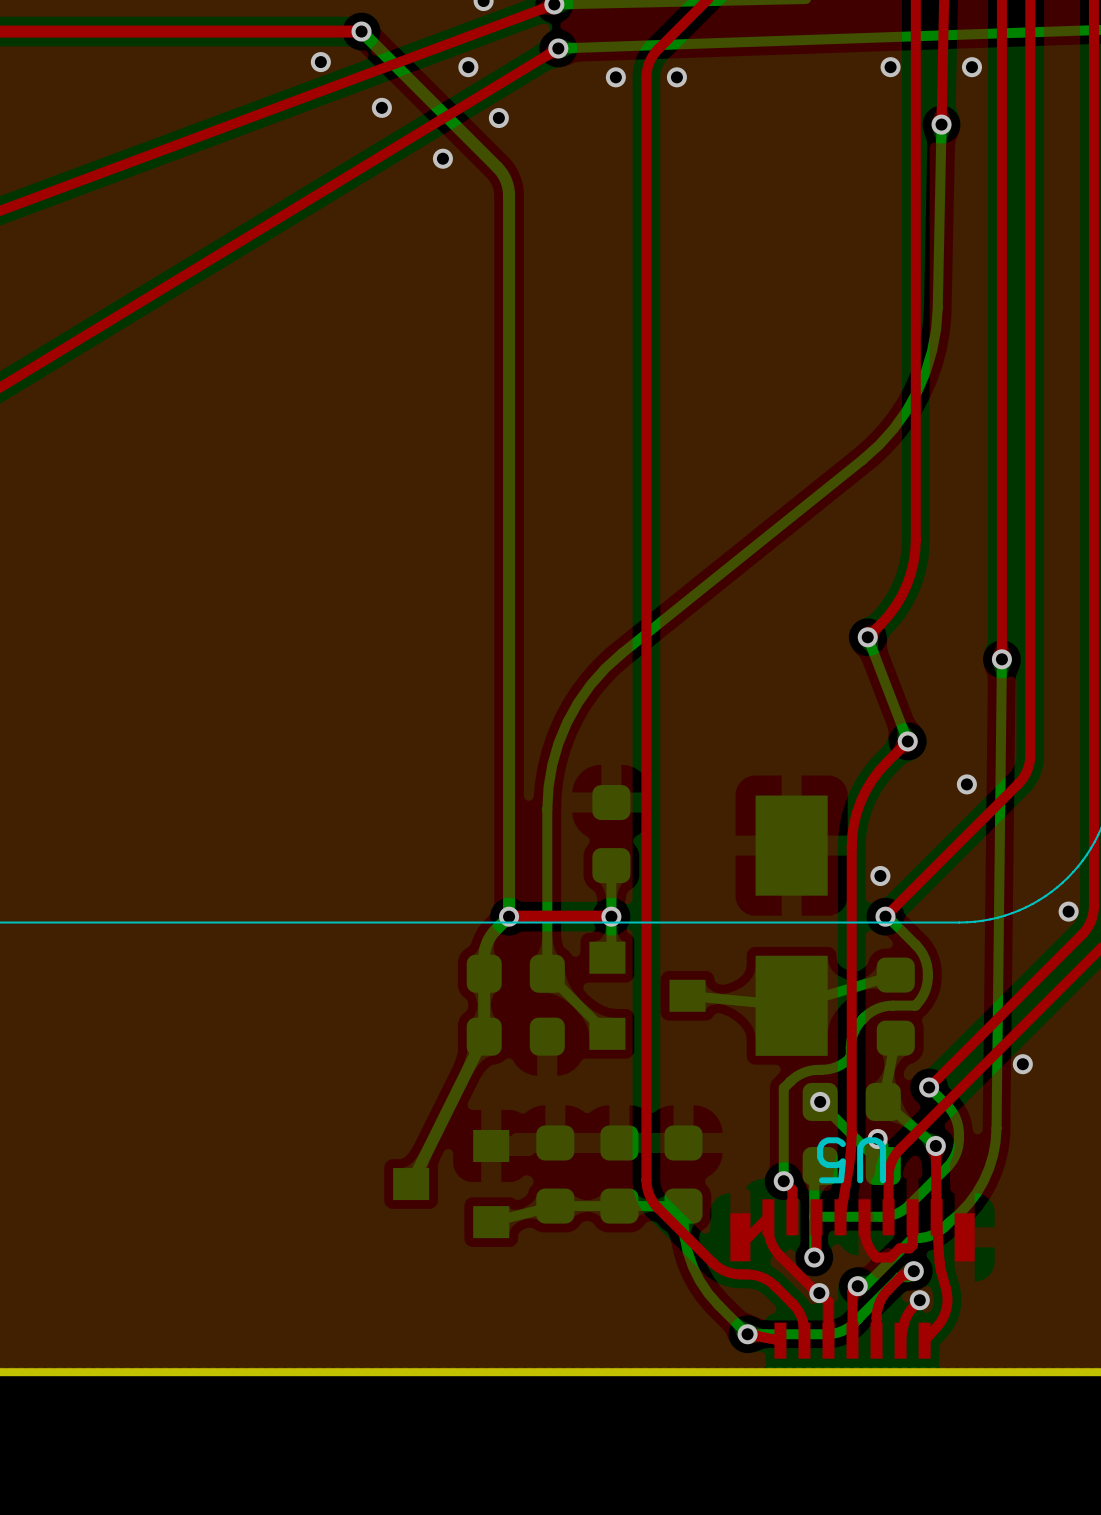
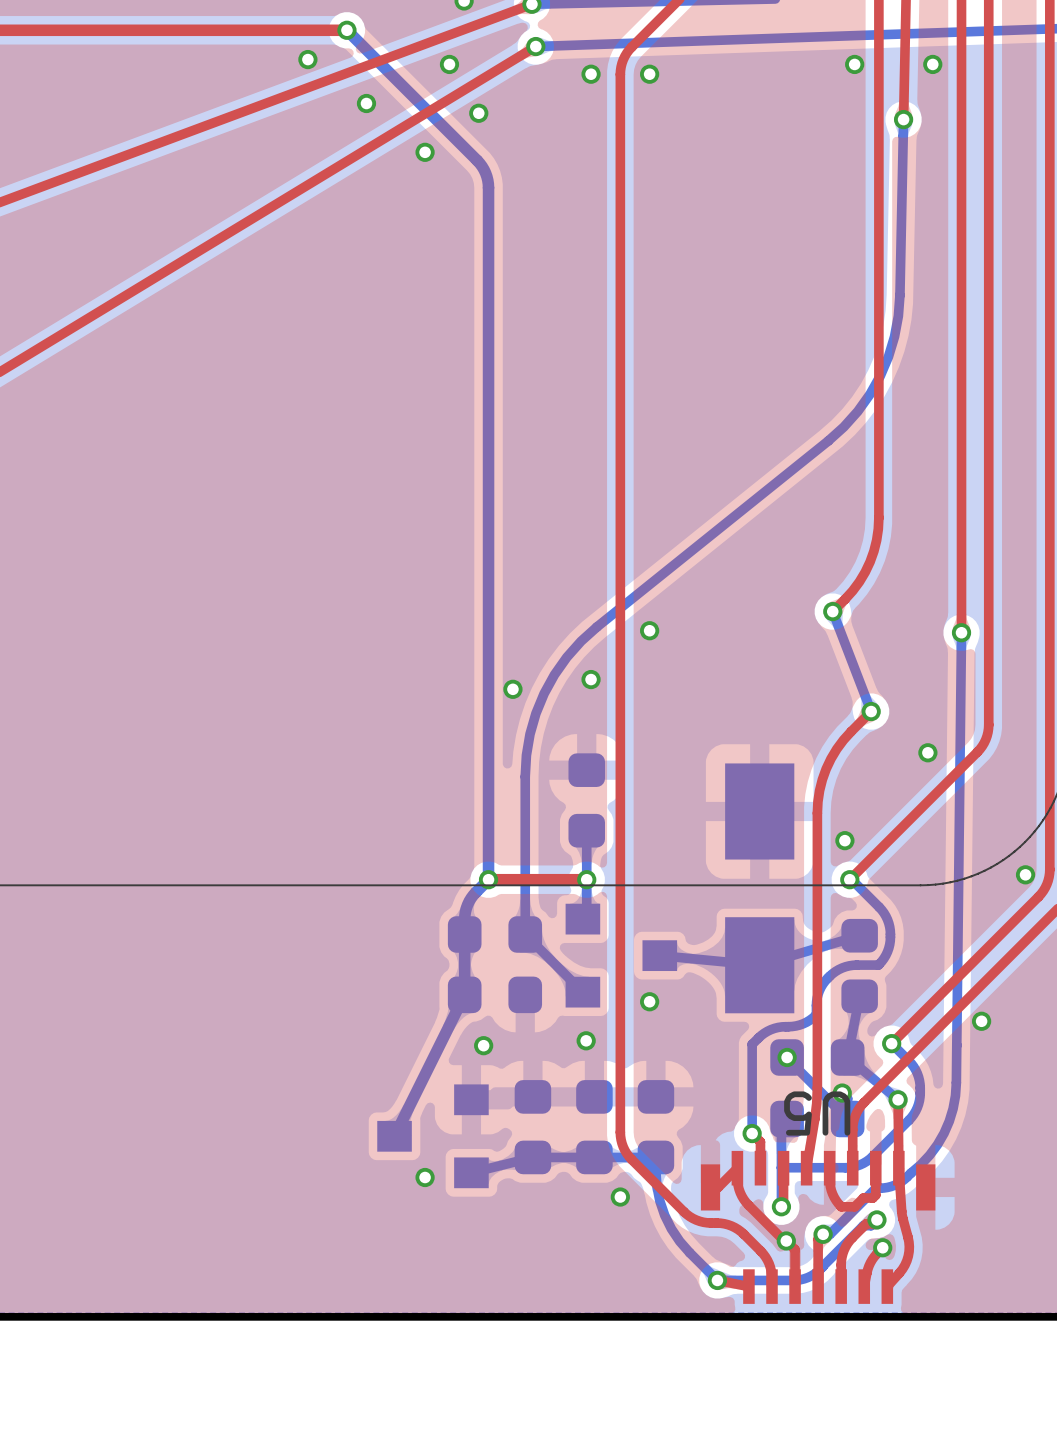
via: none -> (649, 630)
via: none -> (591, 679)
via: none -> (512, 689)
via: none -> (649, 1001)
via: none -> (586, 1040)
via: none -> (483, 1045)
via: none -> (425, 1177)
via: none -> (620, 1197)

